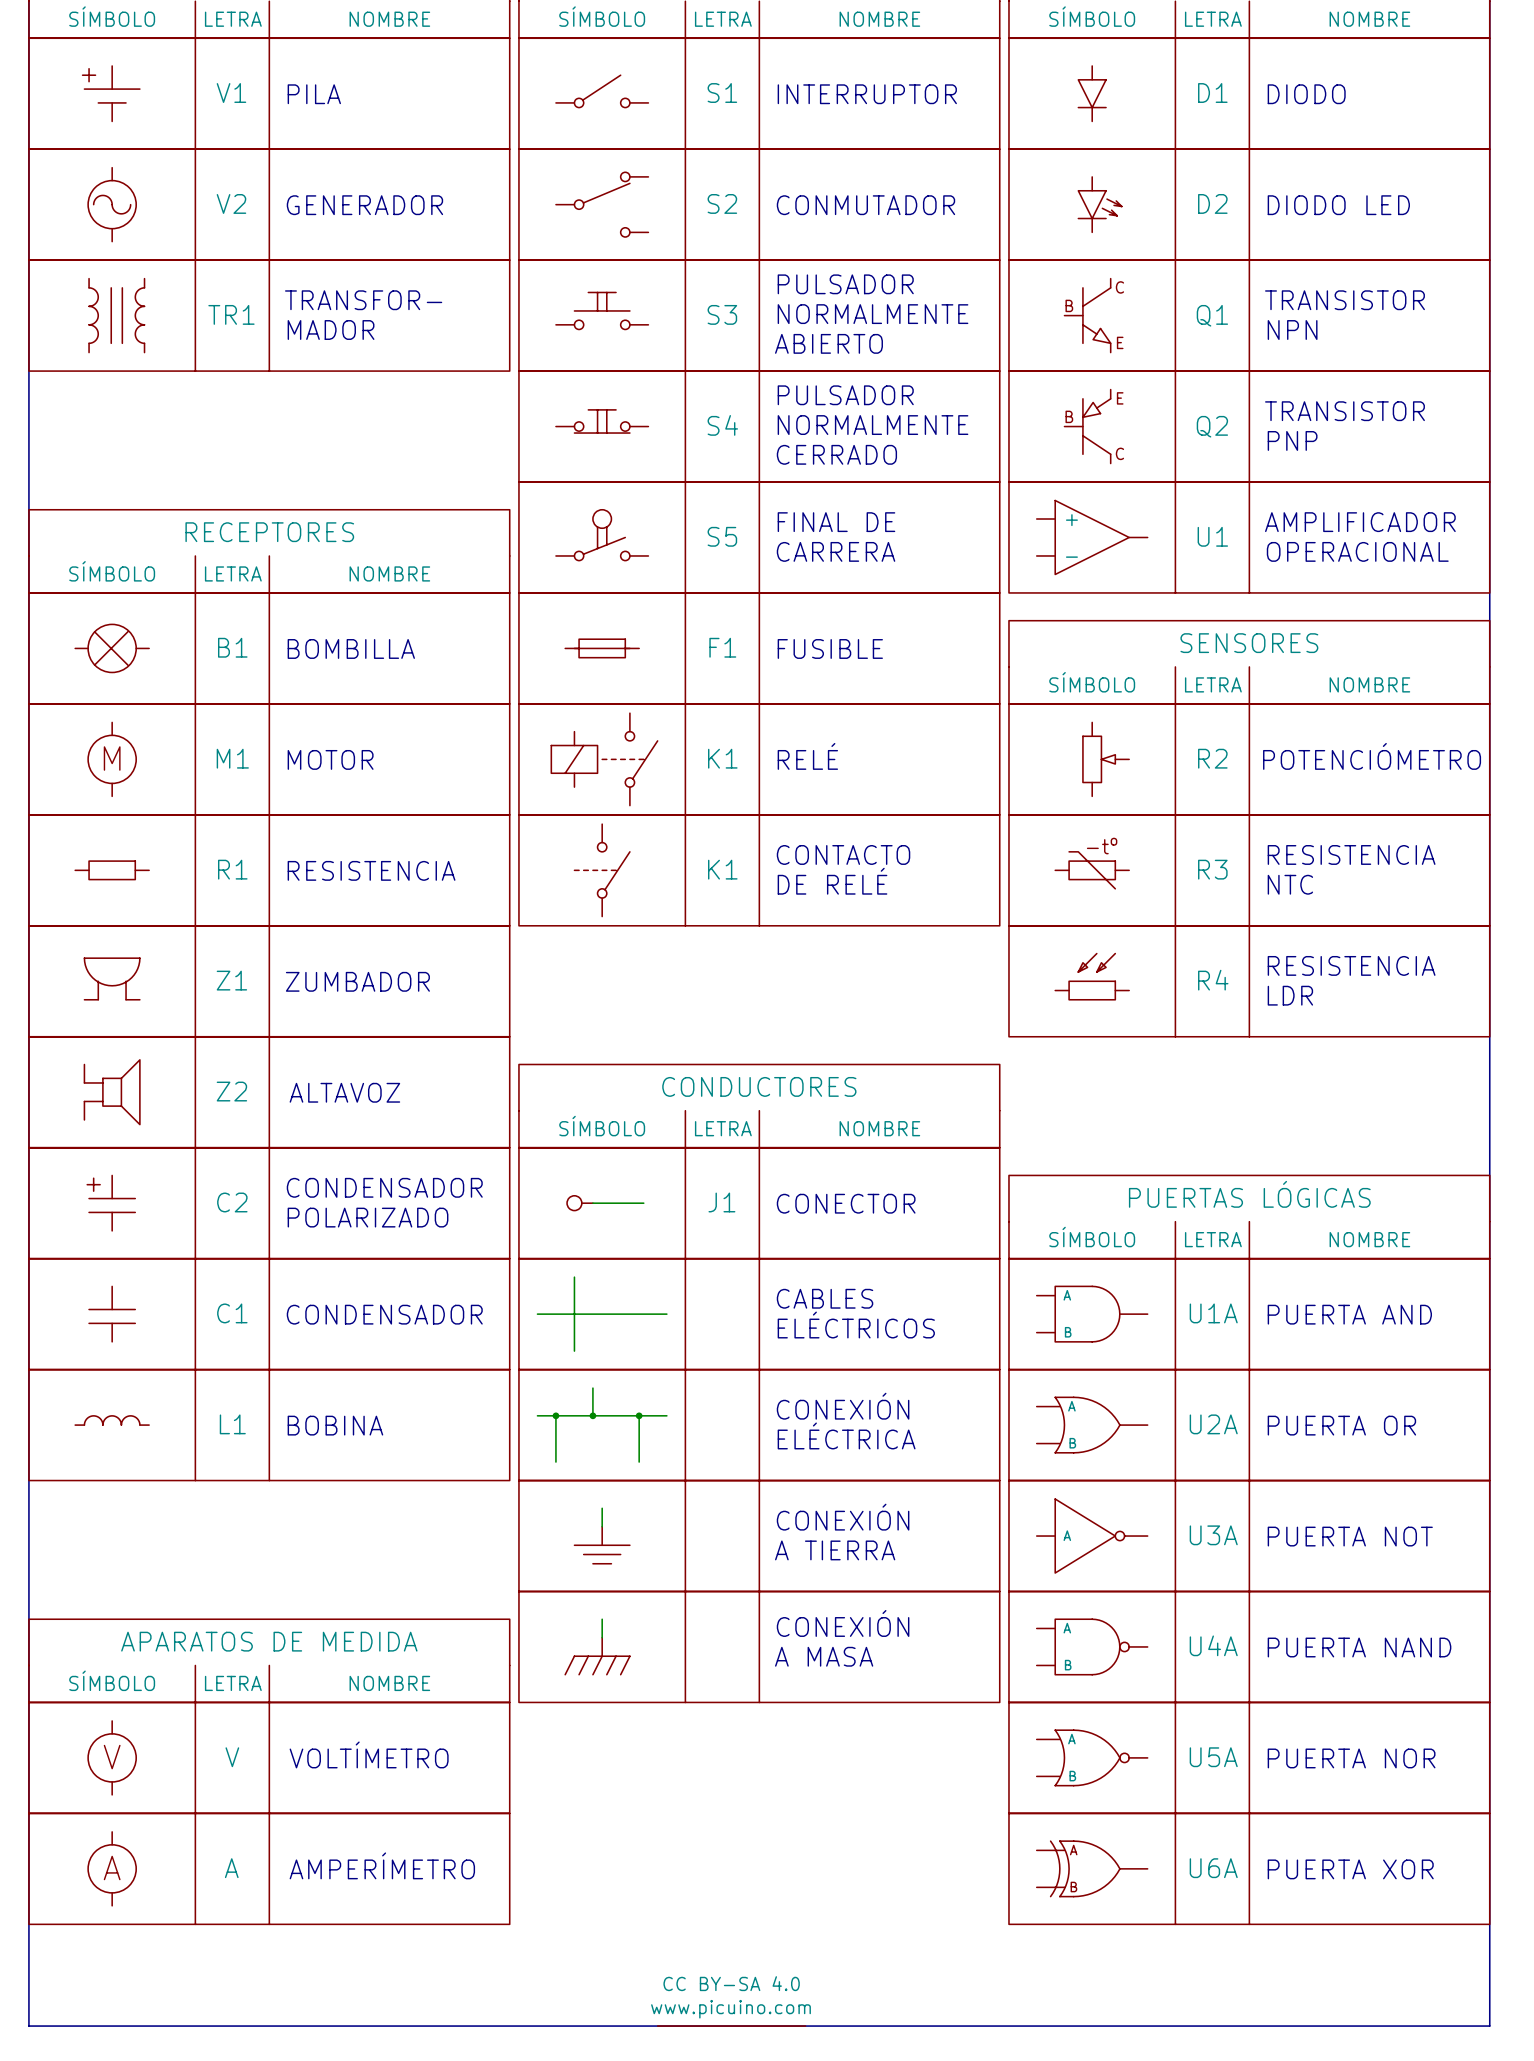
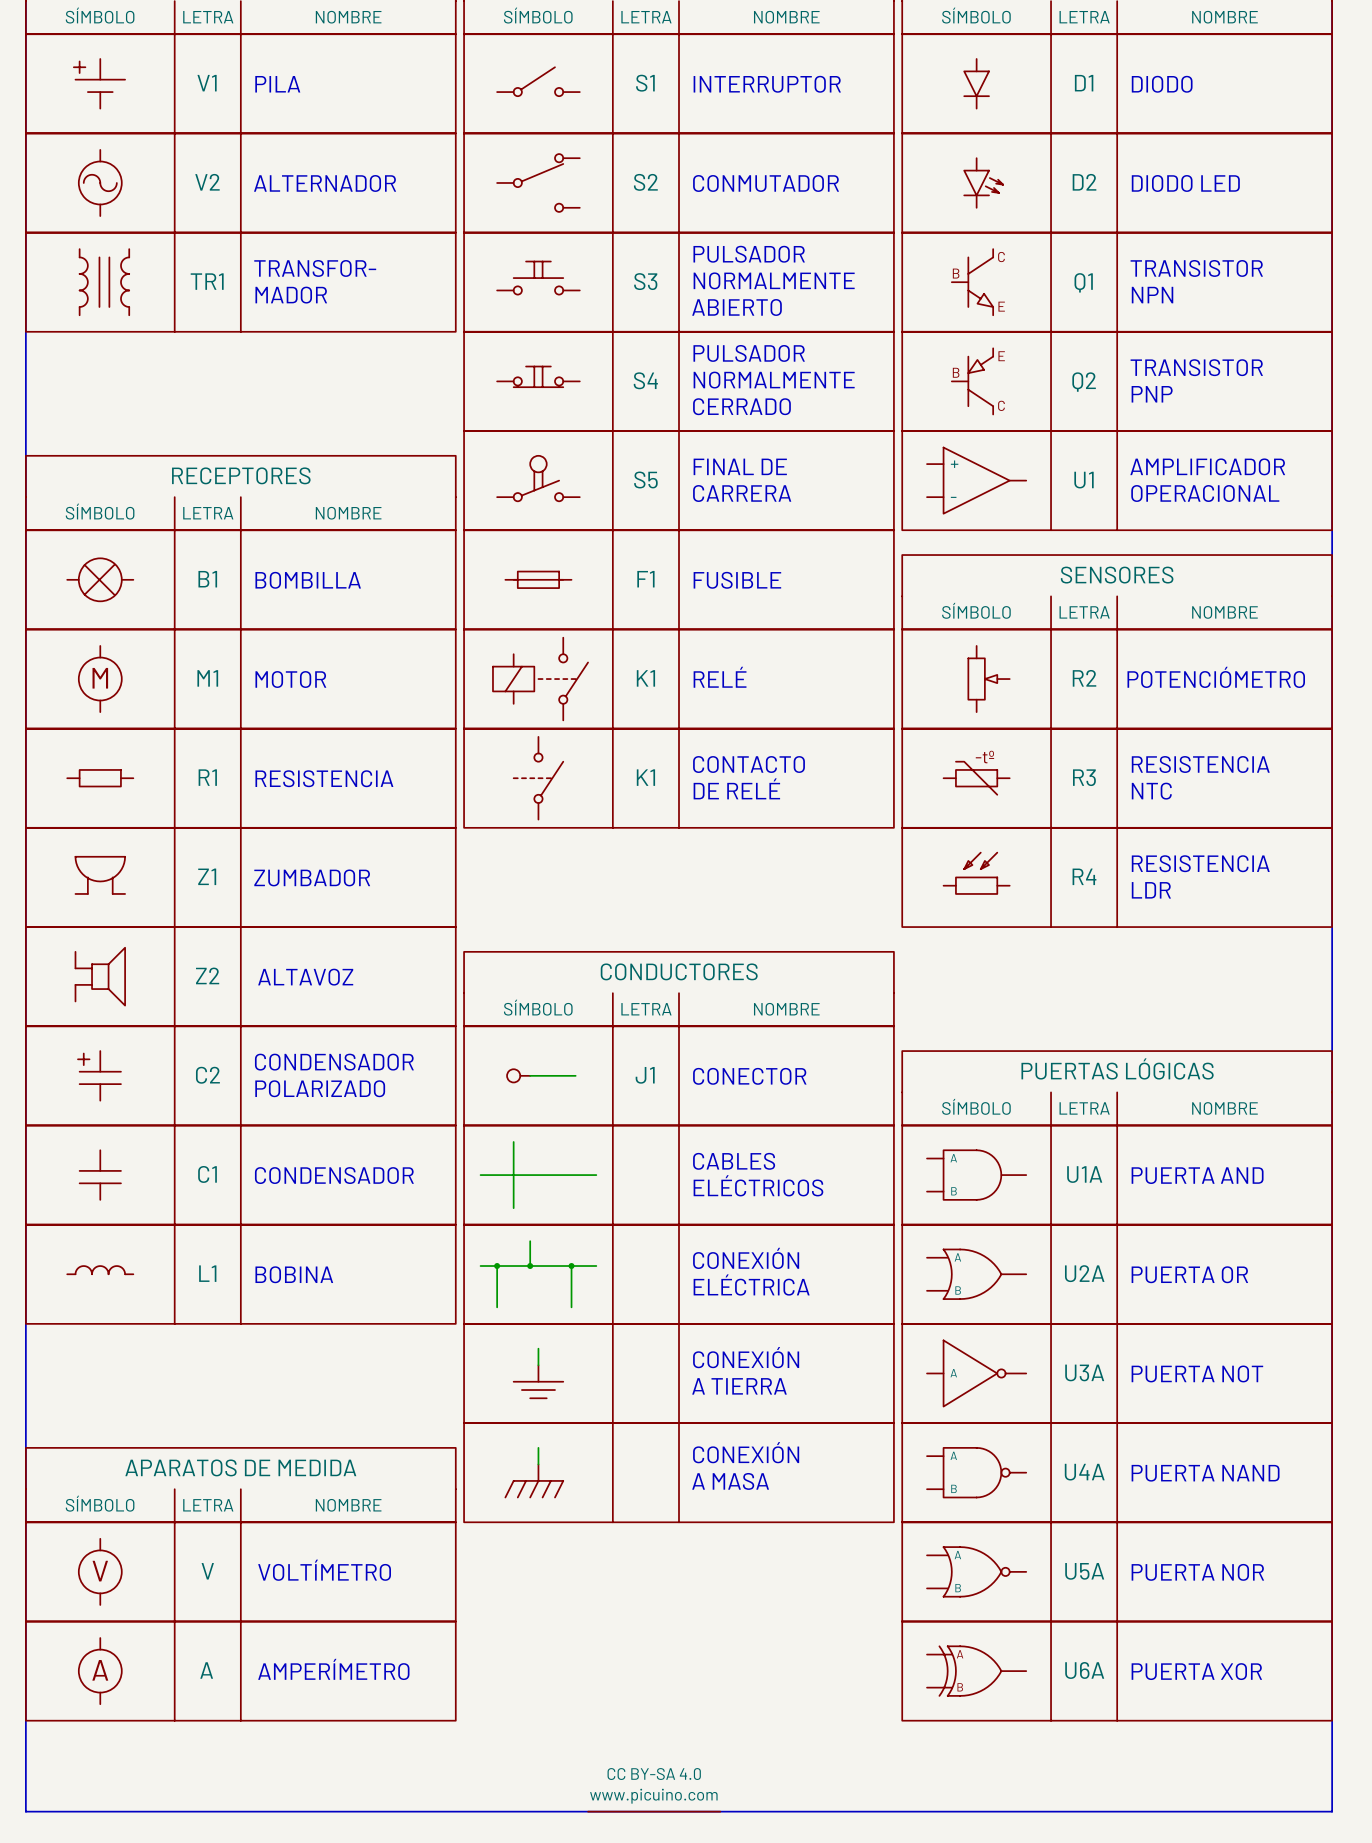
text: GENERADOR (364, 205) -> ALTERNADOR (325, 183)

